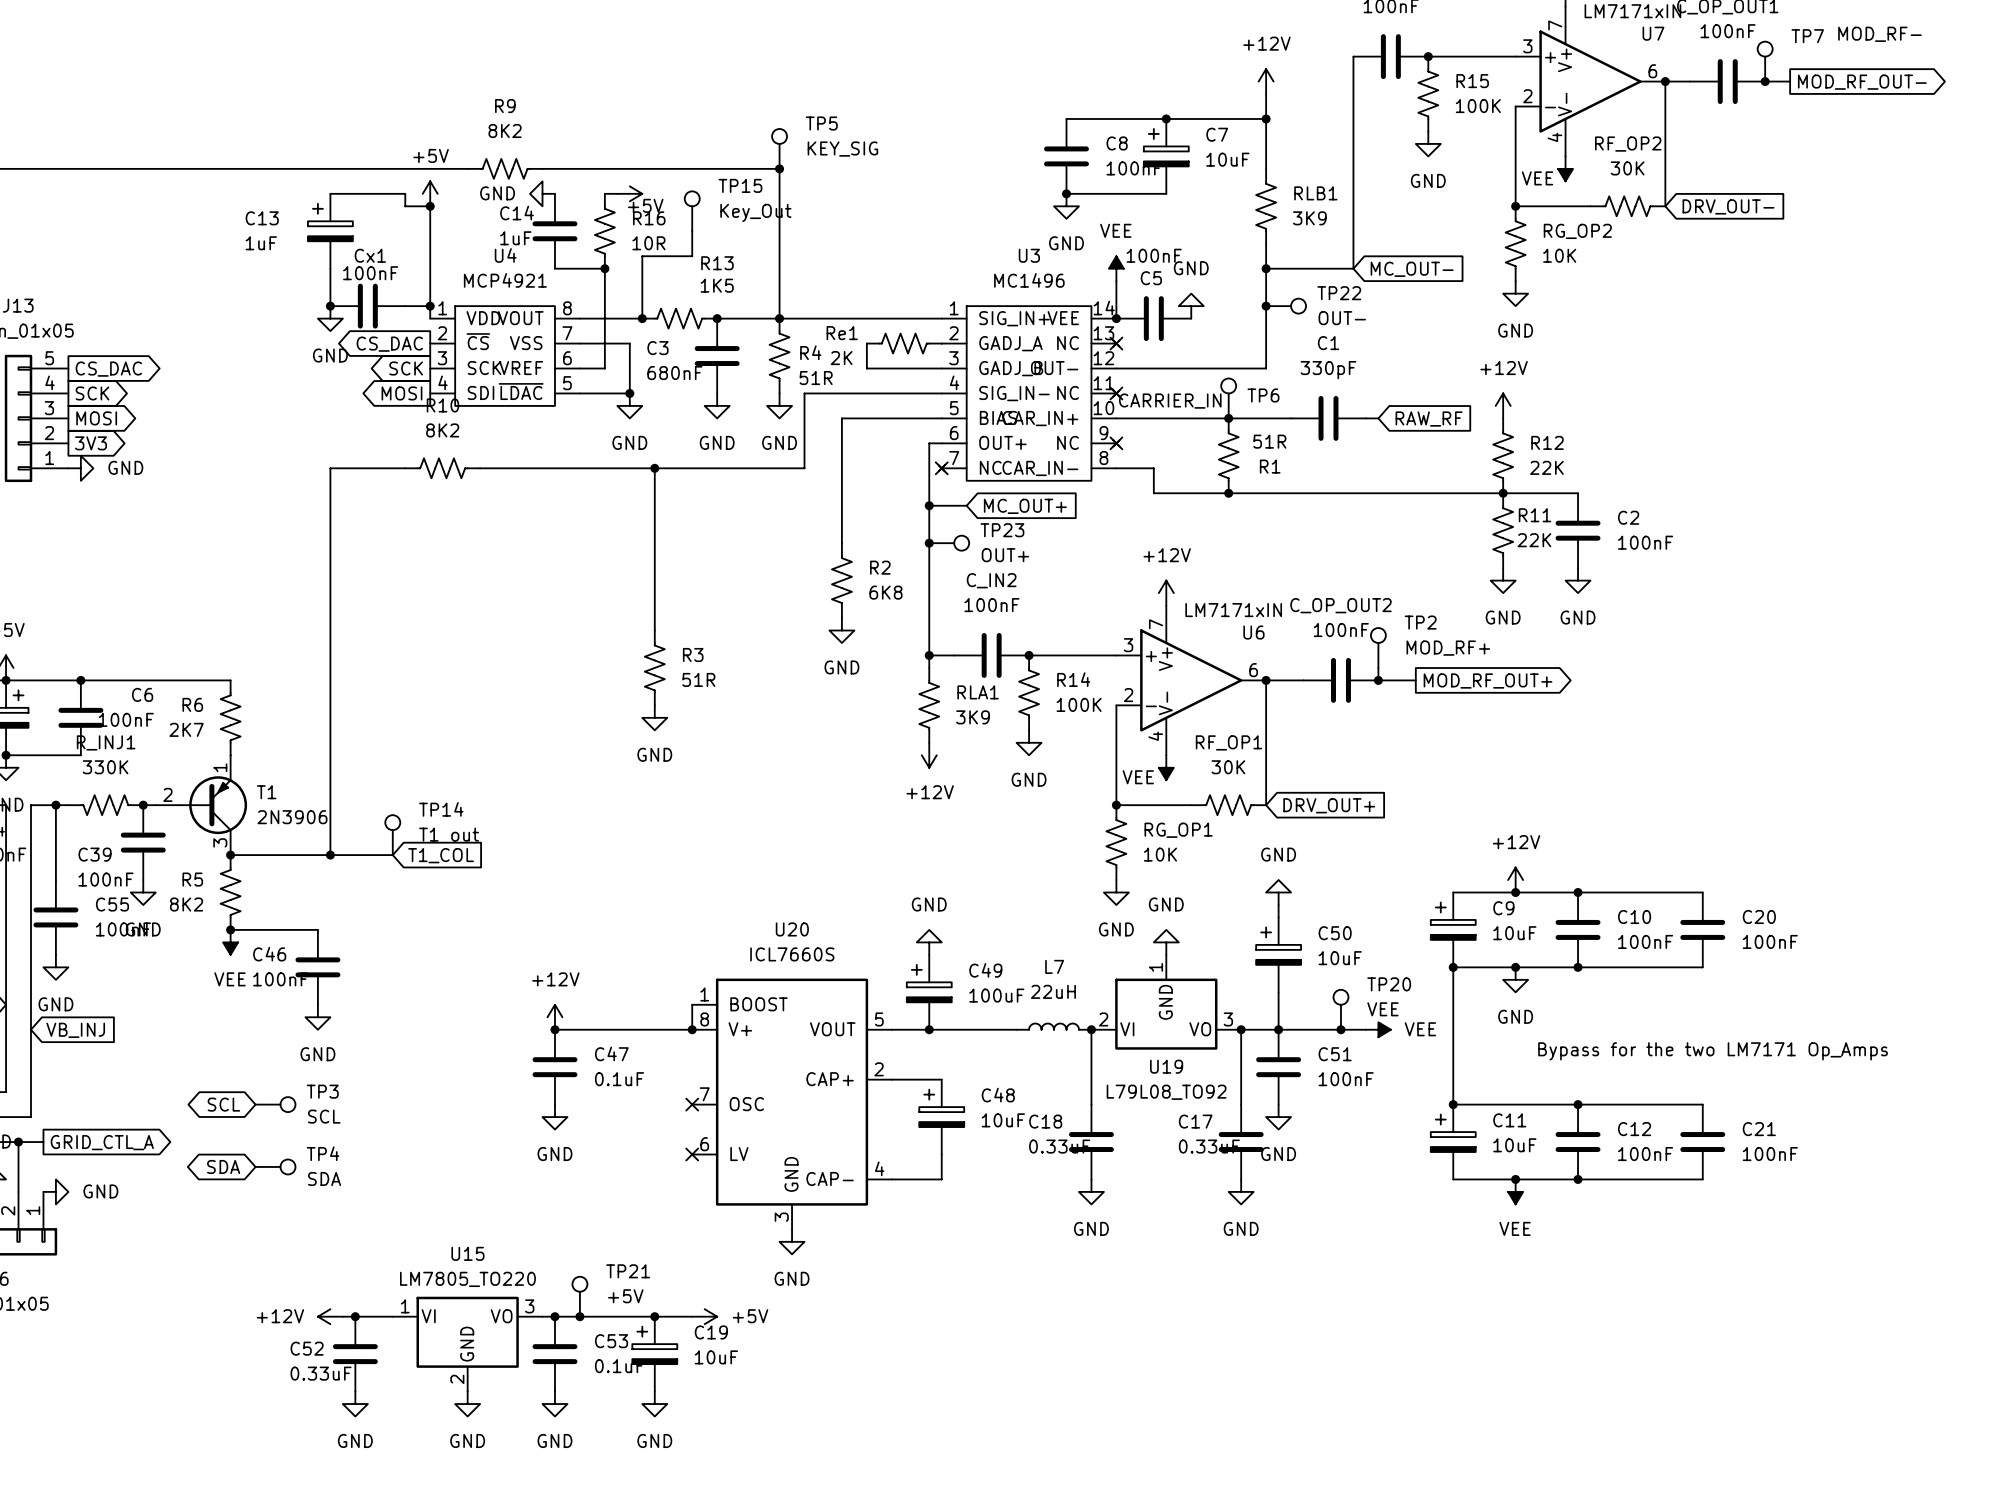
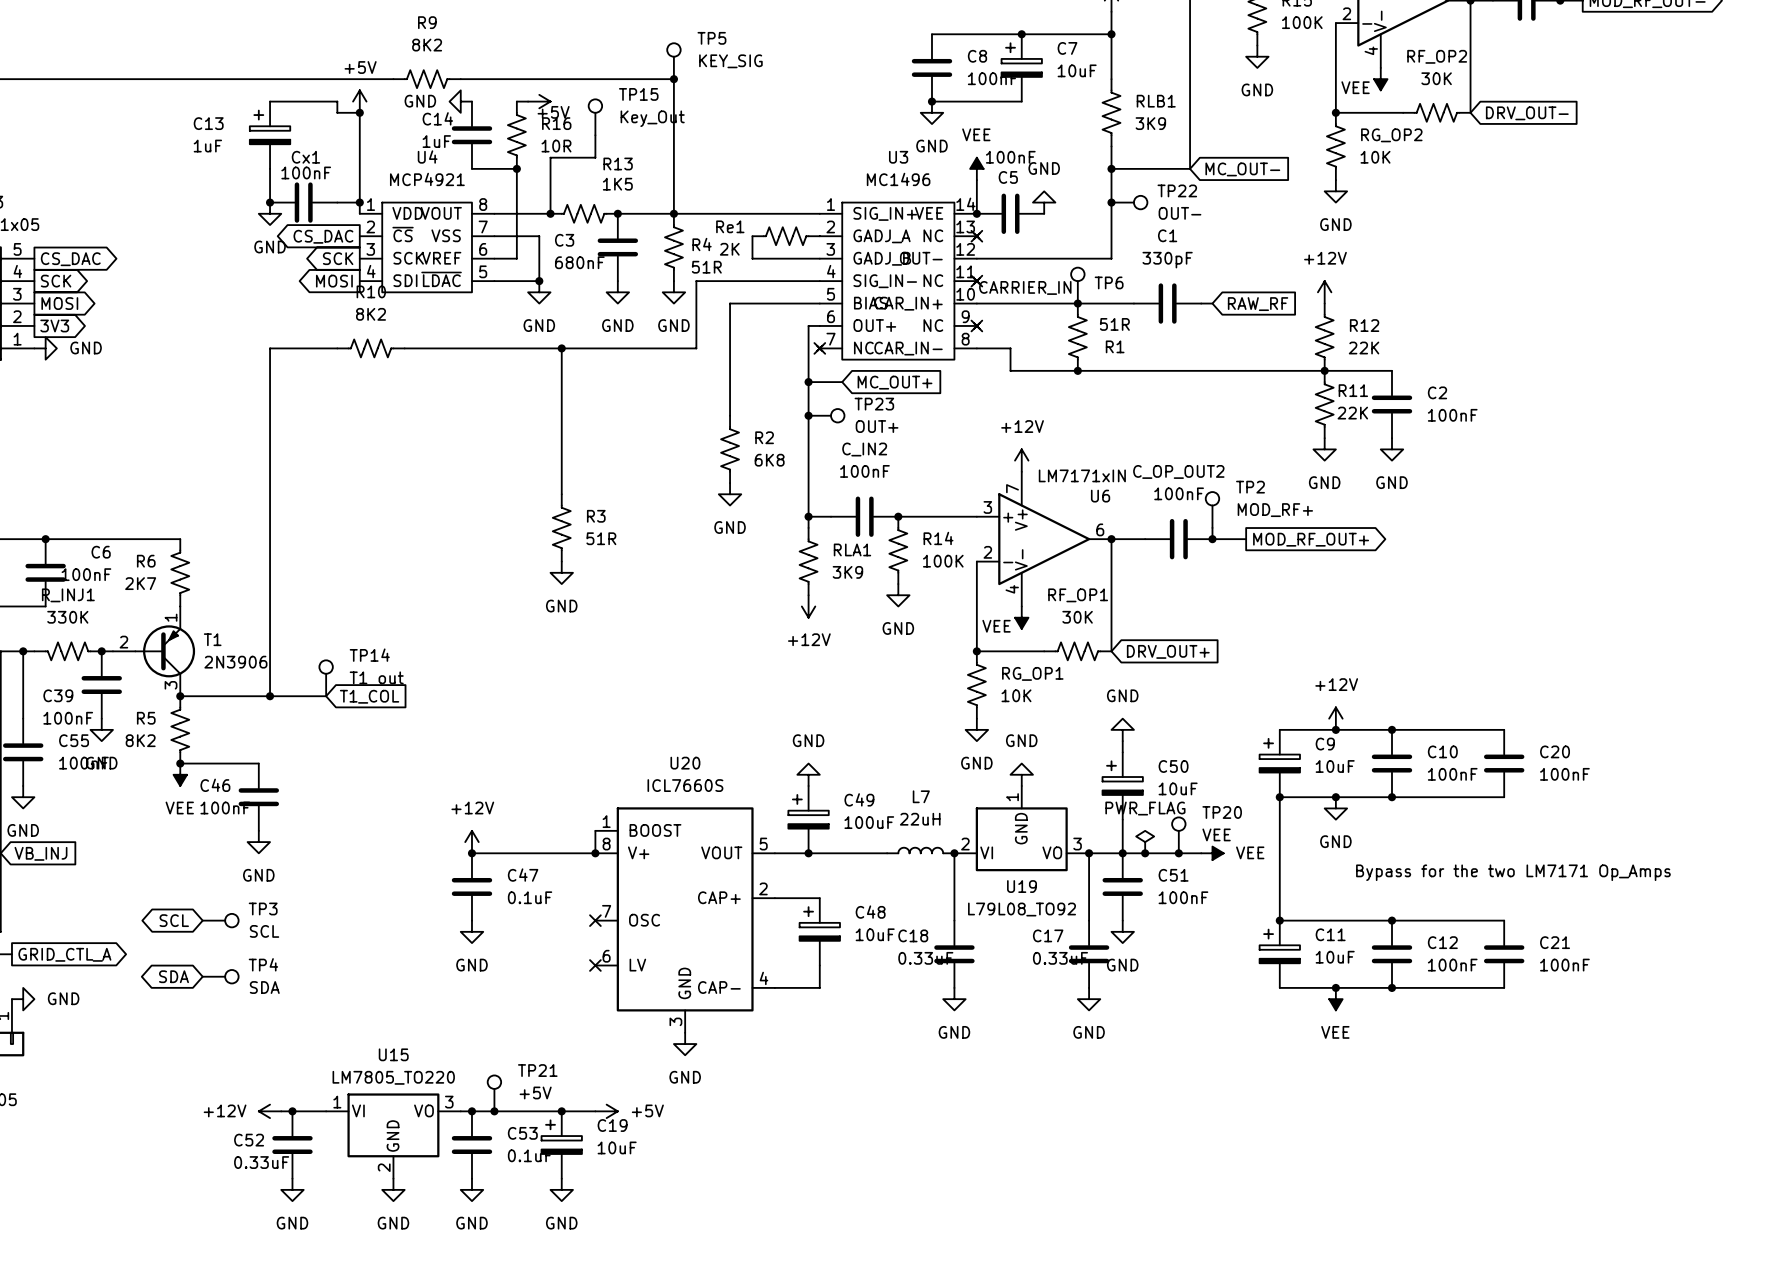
power symbol: none -> PWR_FLAG (1145, 842)
junction: none -> (1145, 853)

